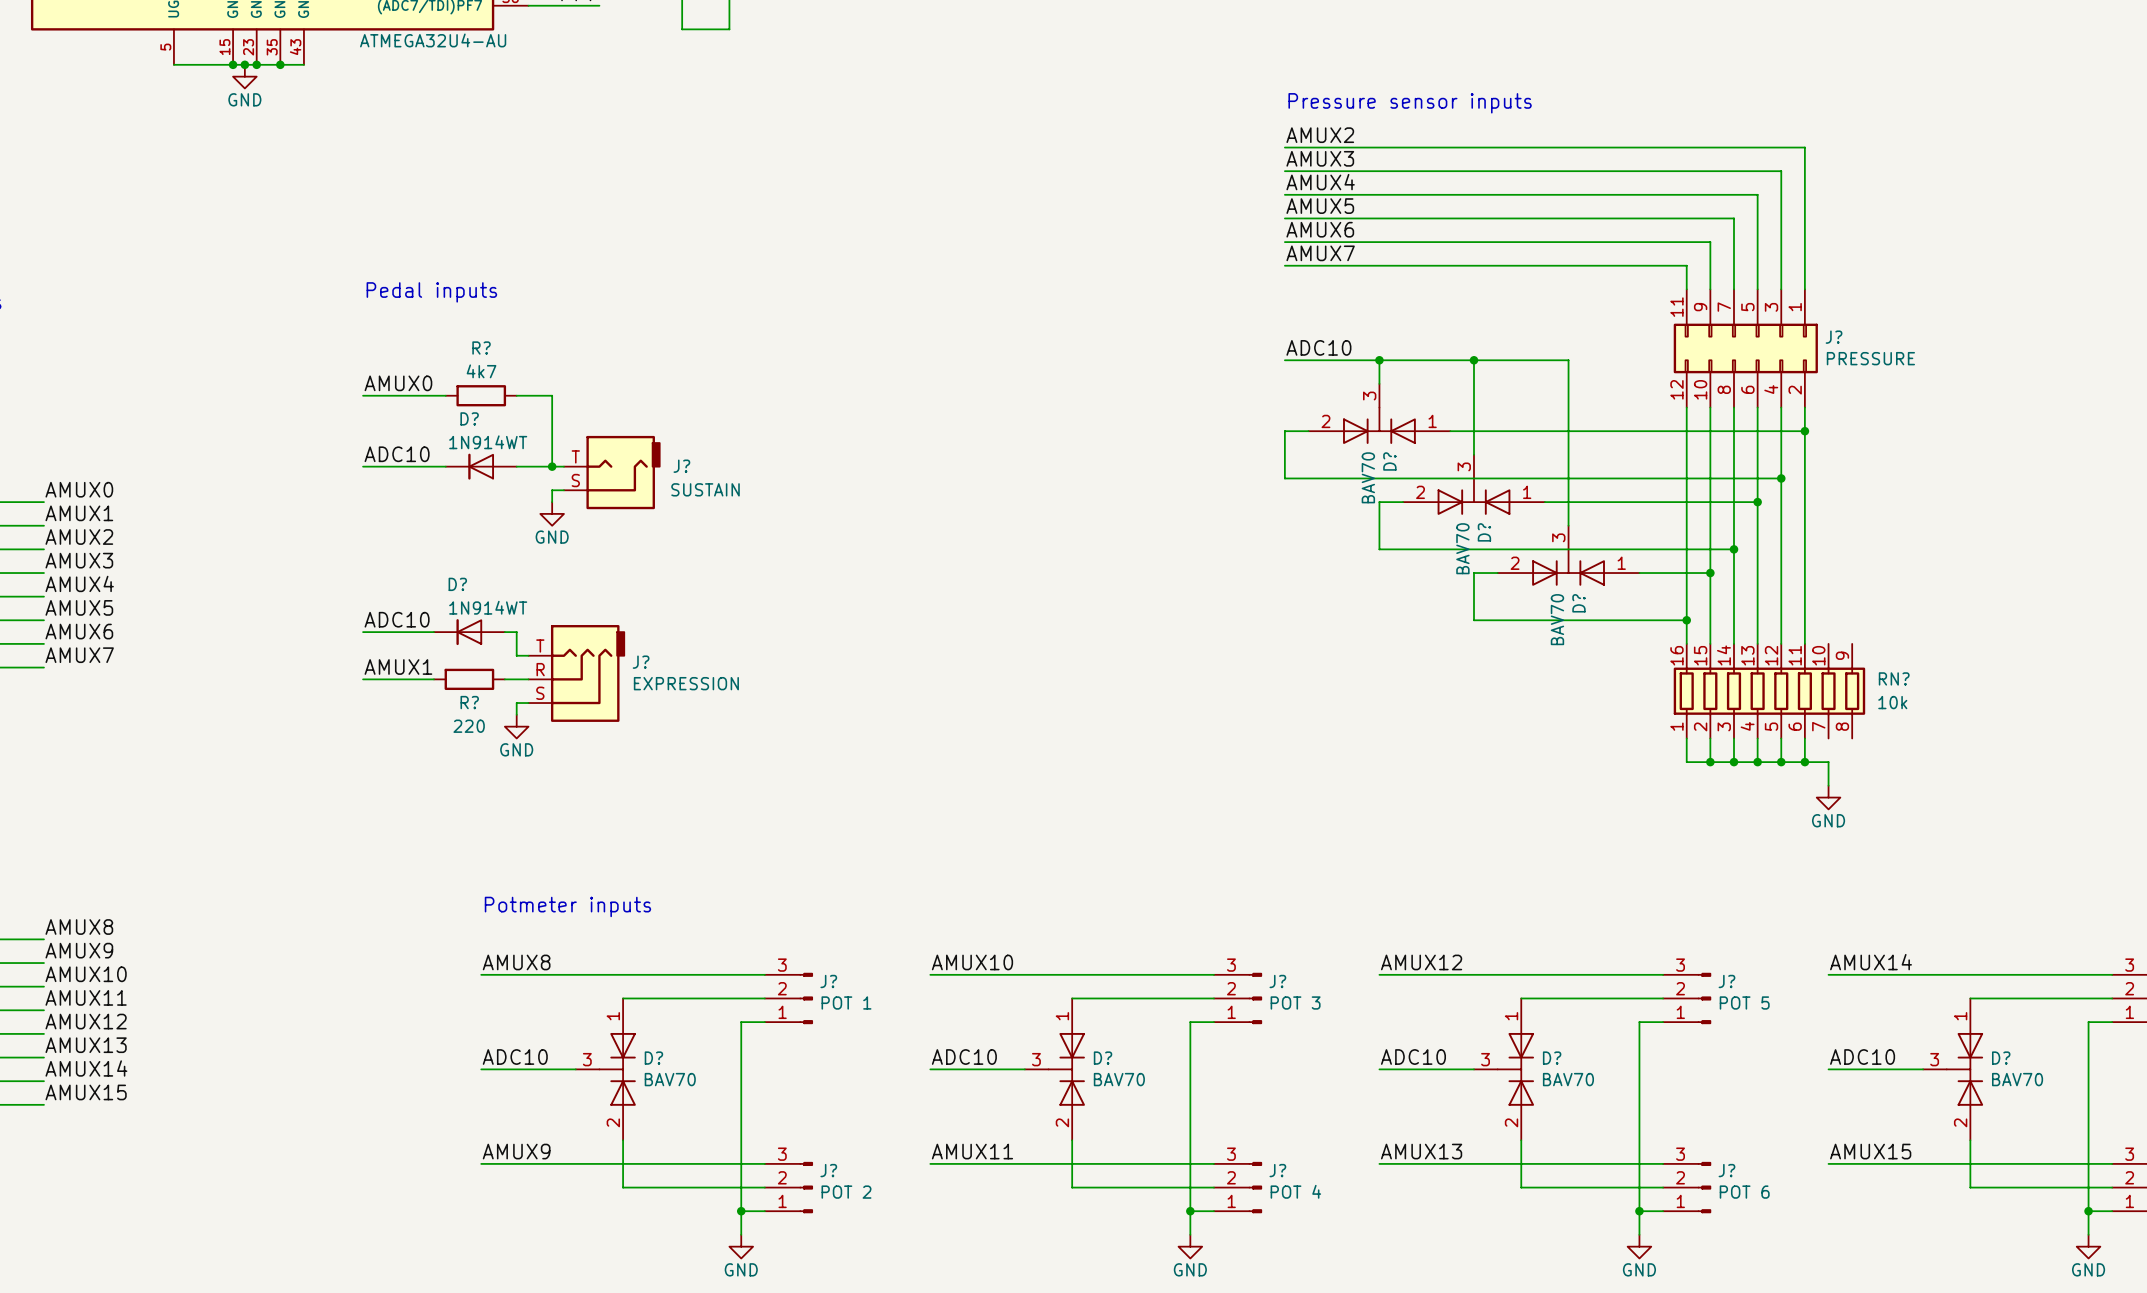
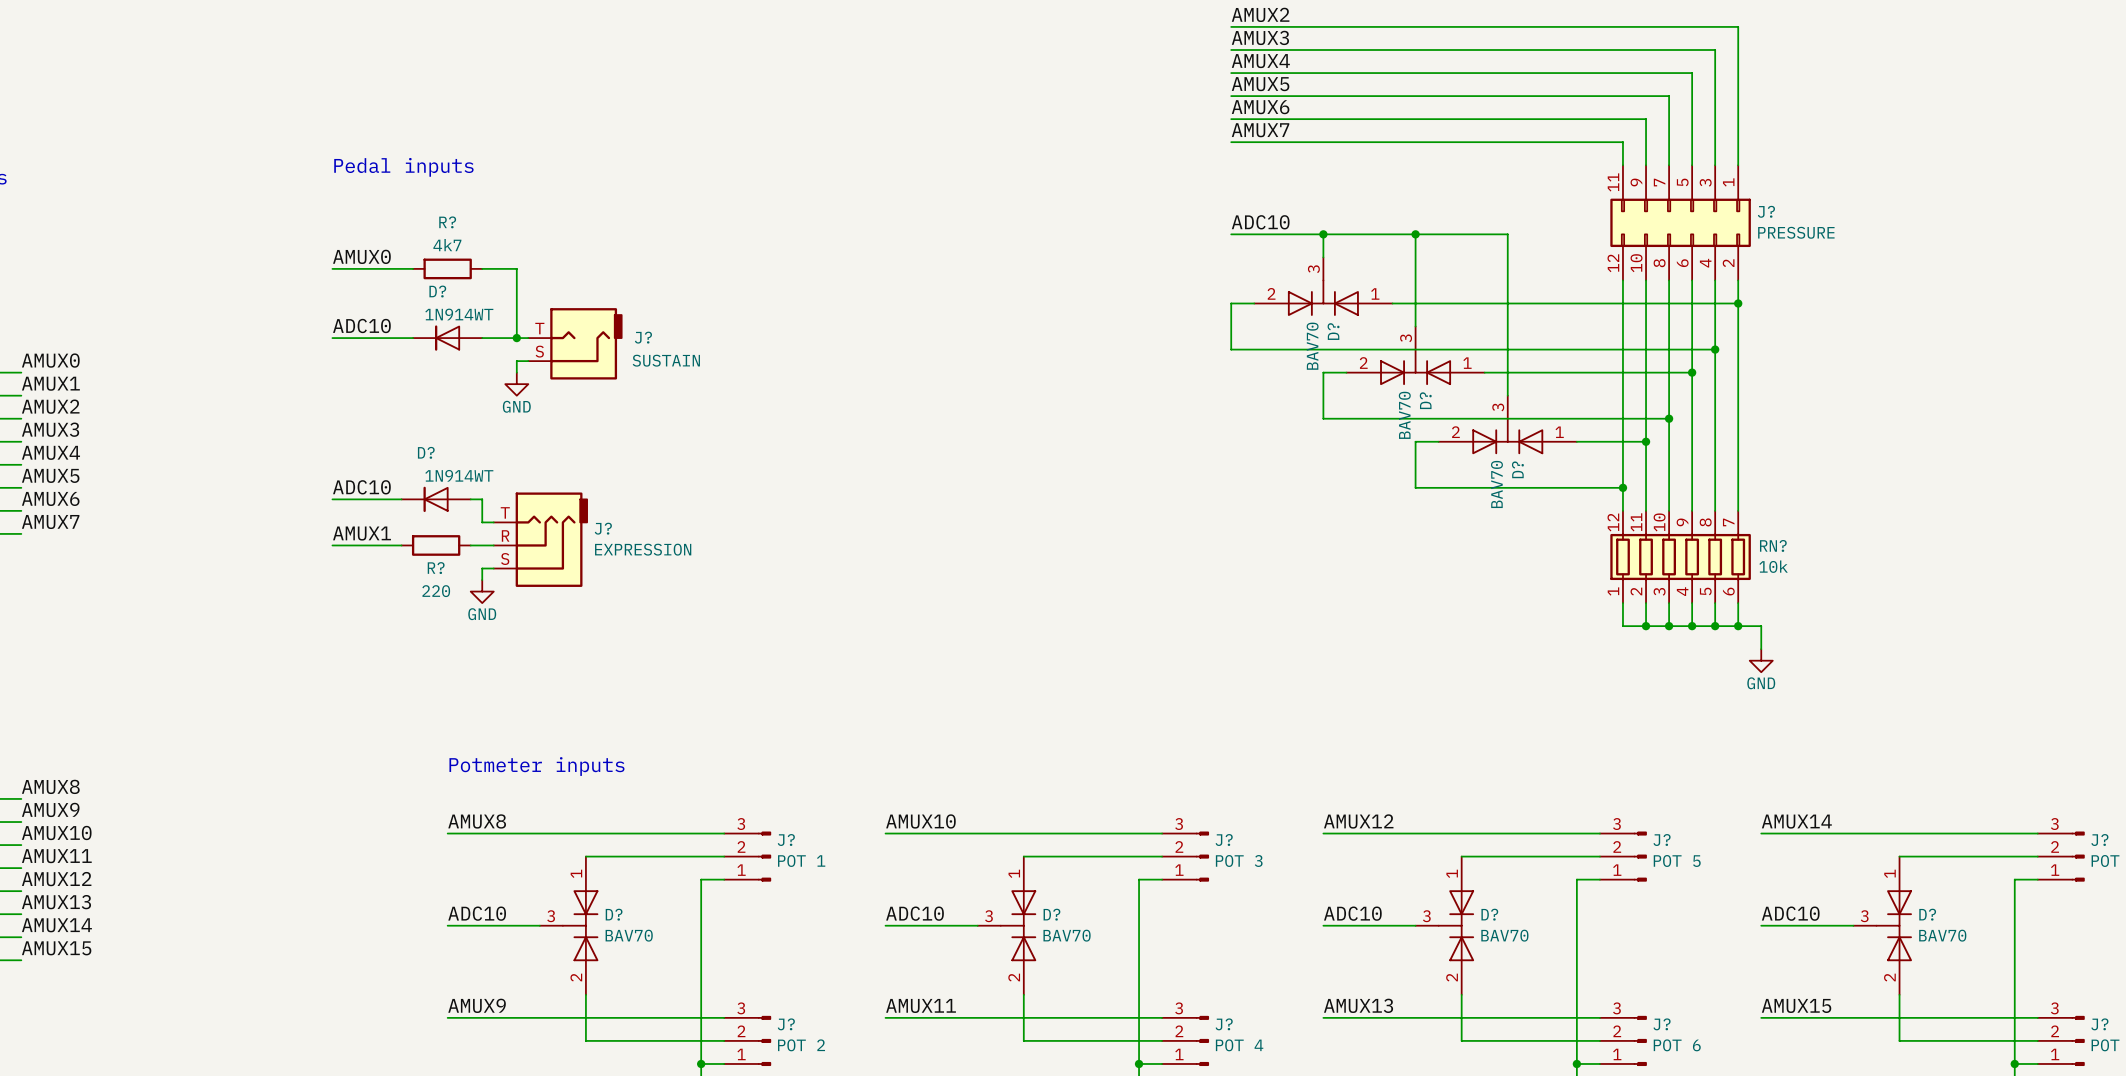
RN?: none -> 10k (1680, 556)
RN?: 10k (1769, 691) -> none

